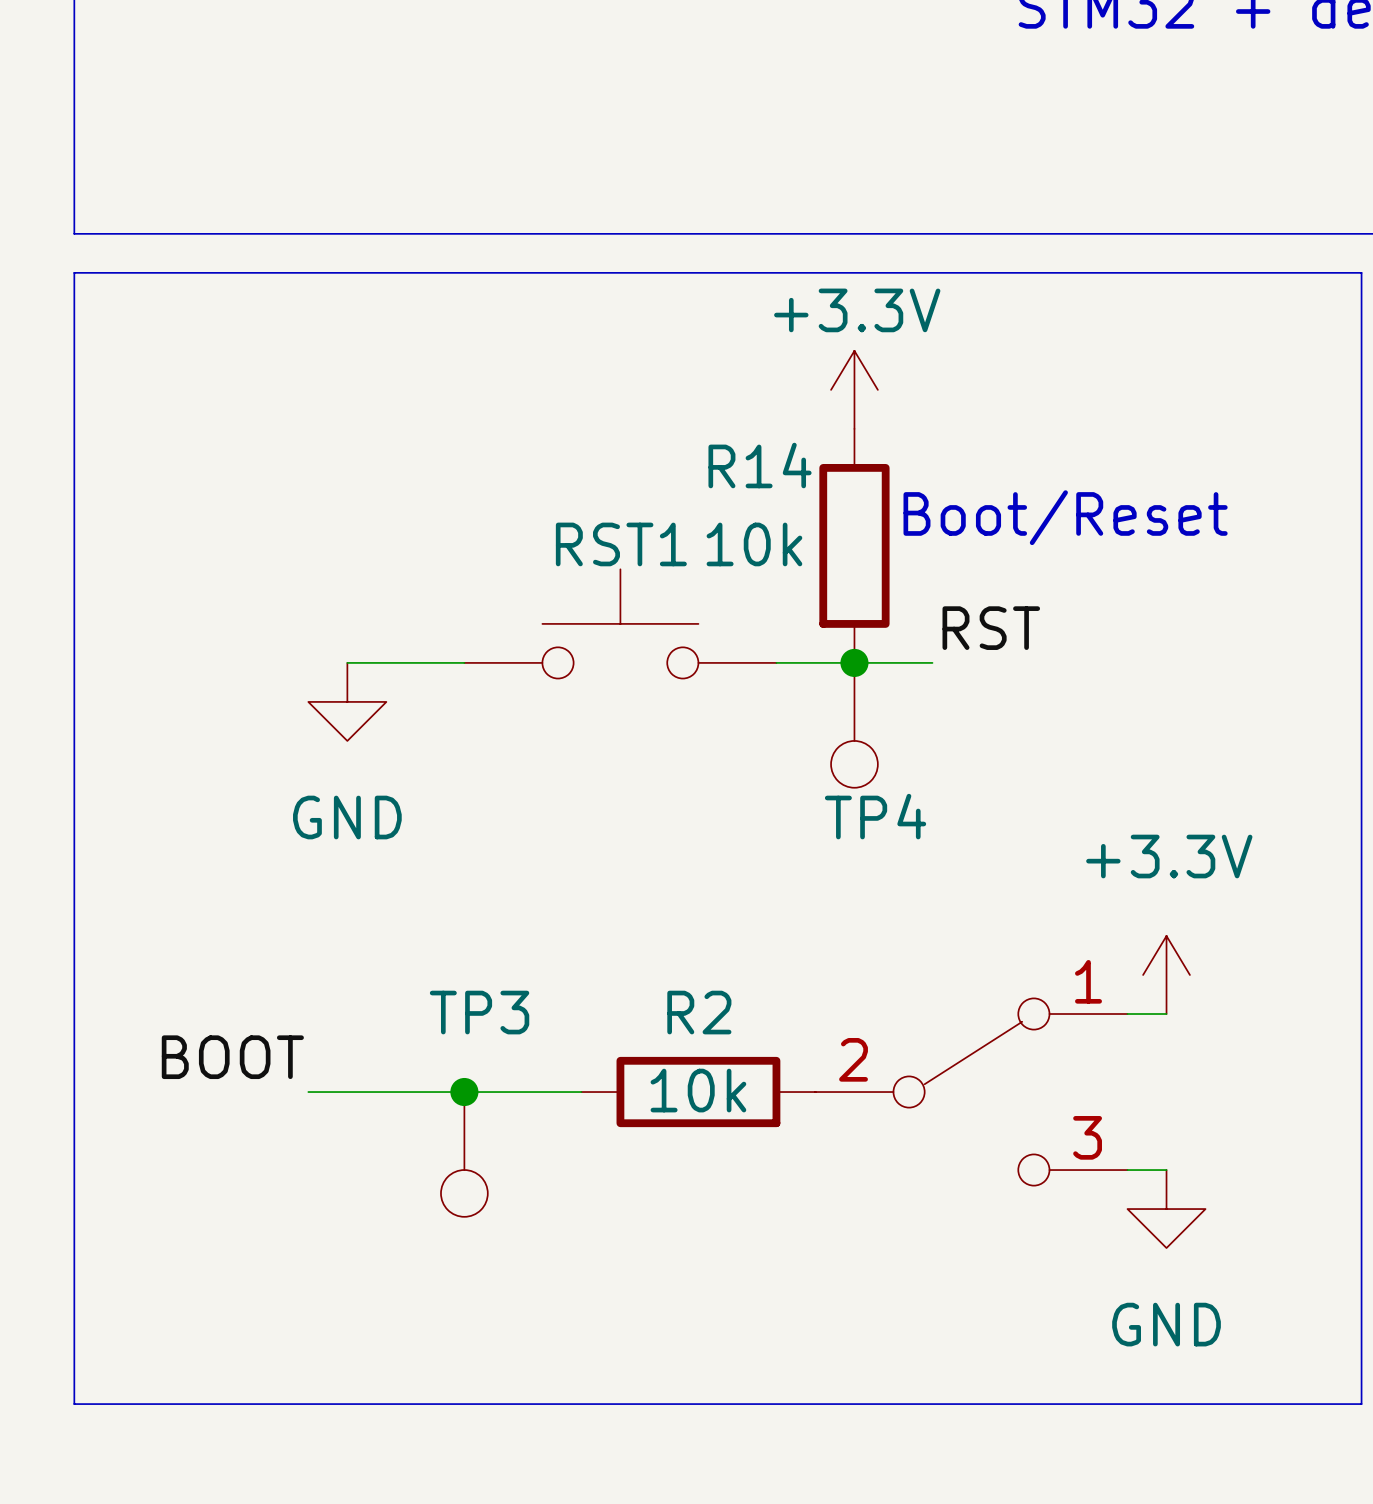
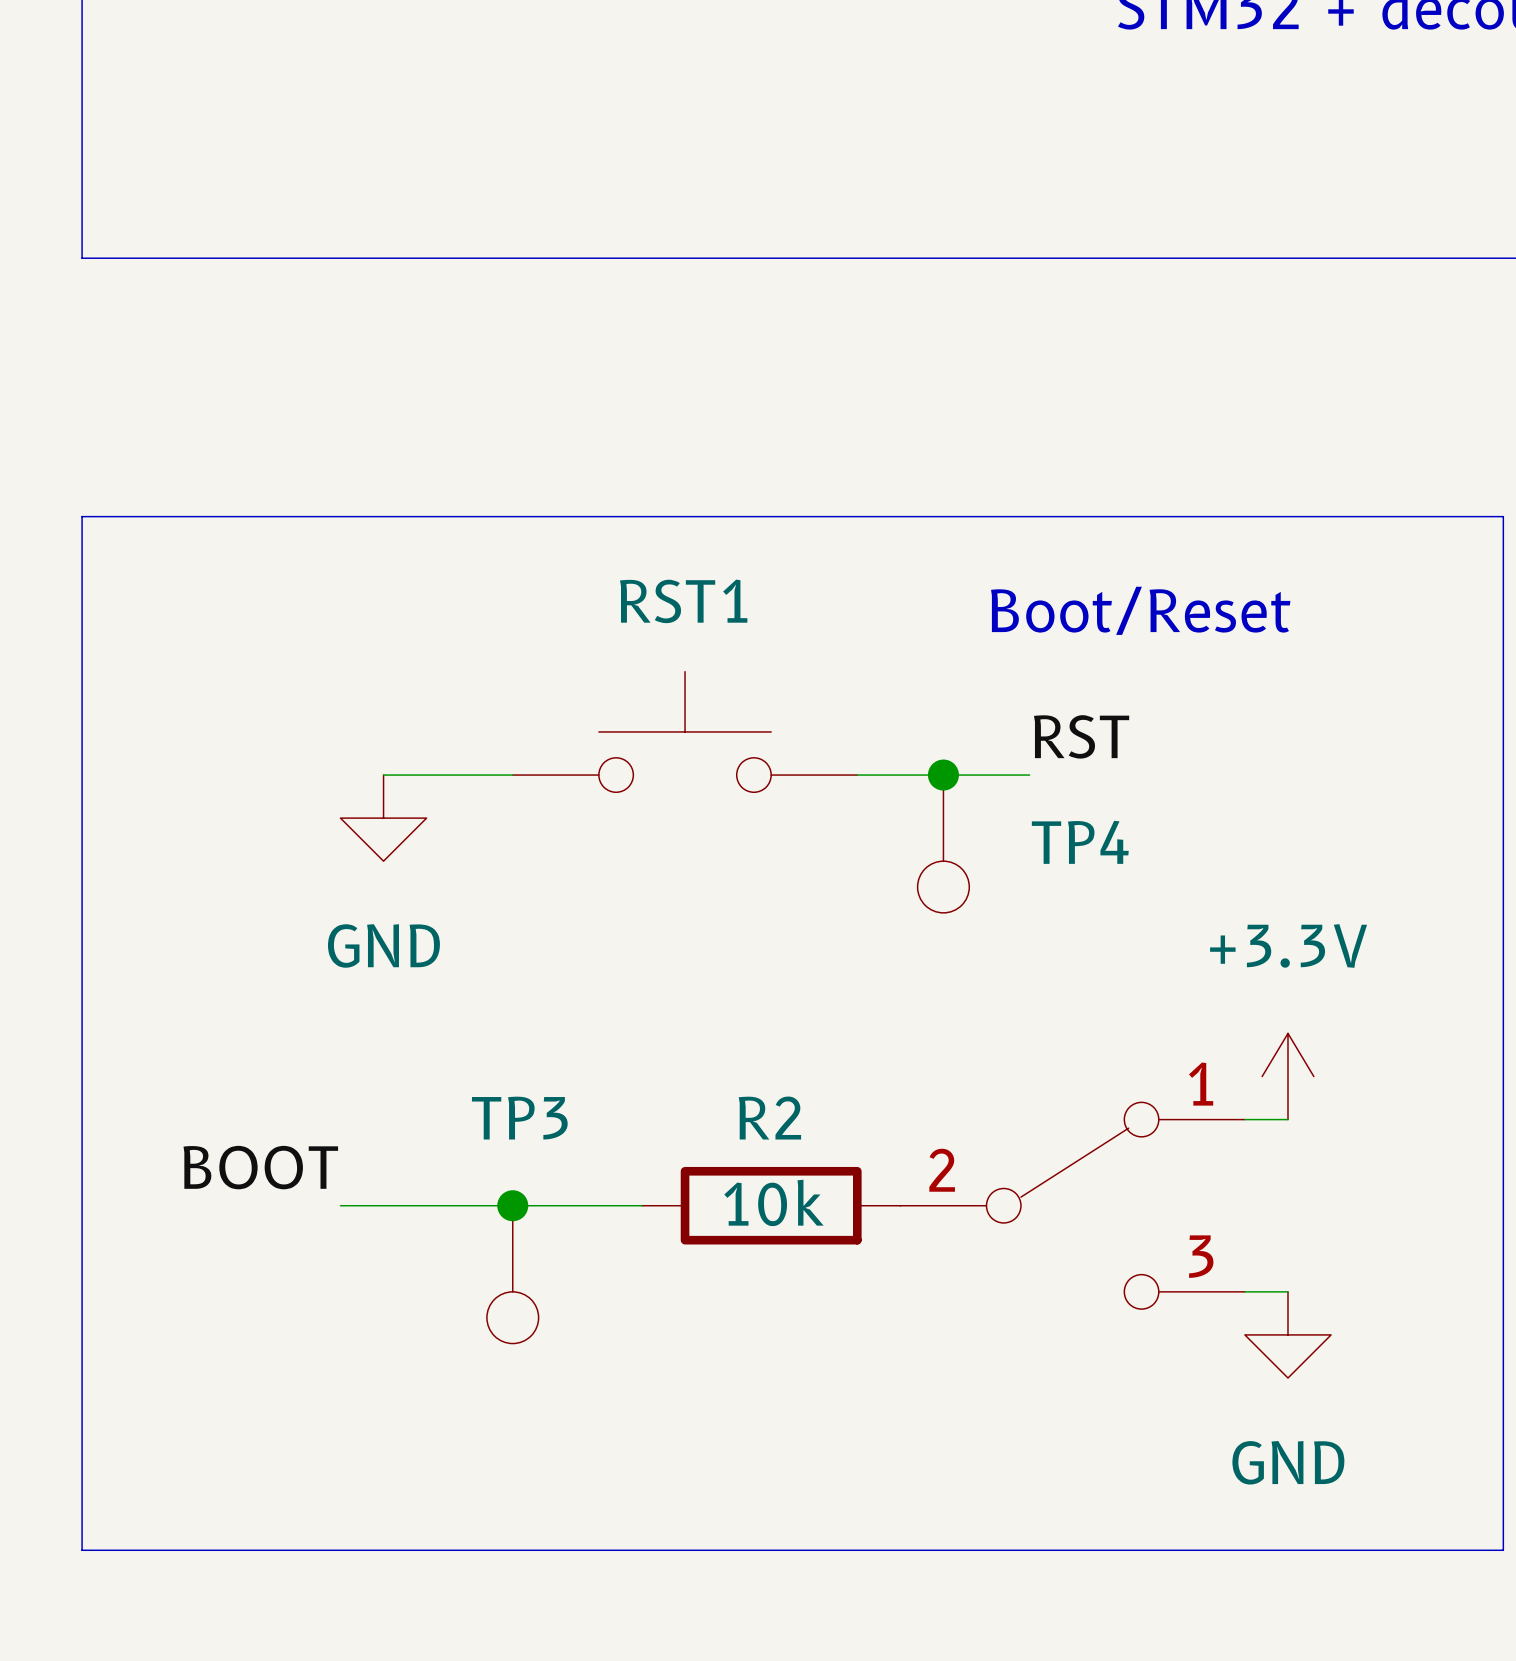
power symbol: +3.3V (854, 389) -> none
line: (74, 467) (74, 272) (1361, 272) (1361, 467) -> (82, 516) (1503, 516)
text position: Boot/Reset (1065, 517) -> Boot/Reset (1140, 610)
R14: 10k (854, 545) -> none
RST1 position: (620, 623) -> (685, 731)
label position: RST (991, 628) -> RST (1081, 736)
wire: (347, 662) (464, 662) -> (383, 775) (512, 775)
wire: (776, 662) (932, 662) -> (857, 775) (1029, 775)
junction position: (854, 662) -> (943, 775)
power symbol position: GND (347, 701) -> GND (383, 818)
TP4 position: (854, 725) -> (943, 843)
TP4 name position: TP4 (875, 816) -> TP4 (1080, 842)

